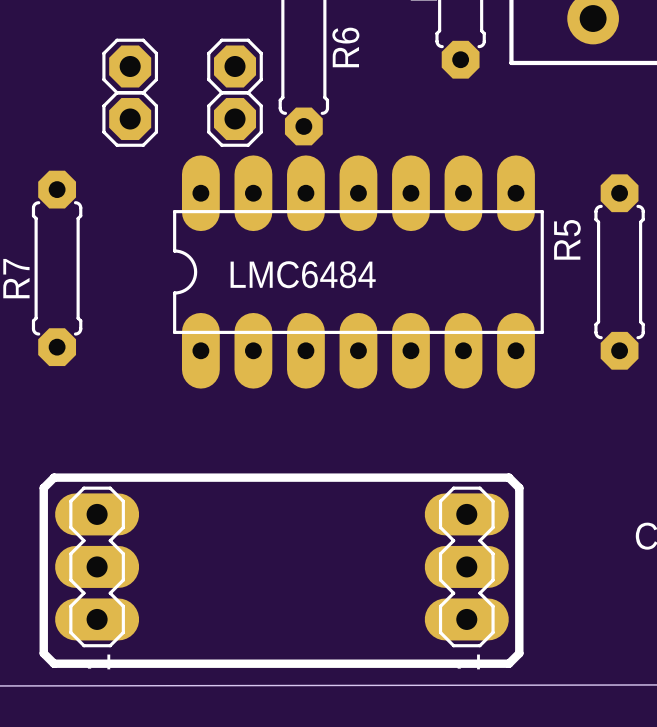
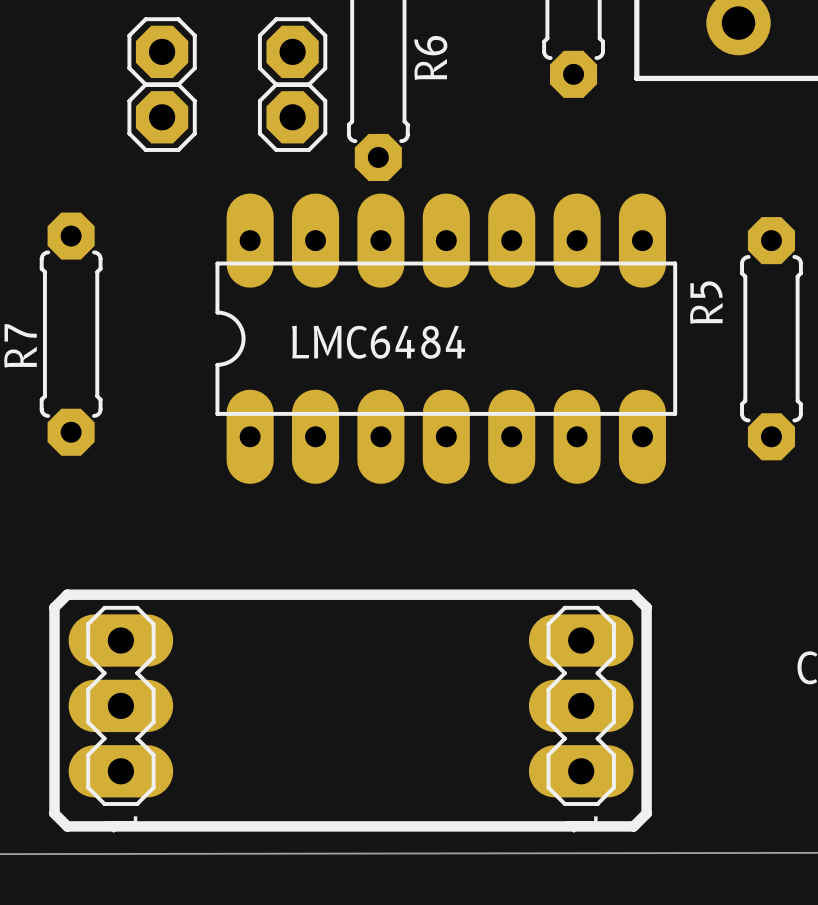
part: none -> (162, 51)
part: none -> (292, 51)
part: (130, 66) -> none
part: (235, 66) -> none
part: none -> (162, 117)
part: none -> (292, 117)
part: (130, 119) -> none
part: (235, 119) -> none

